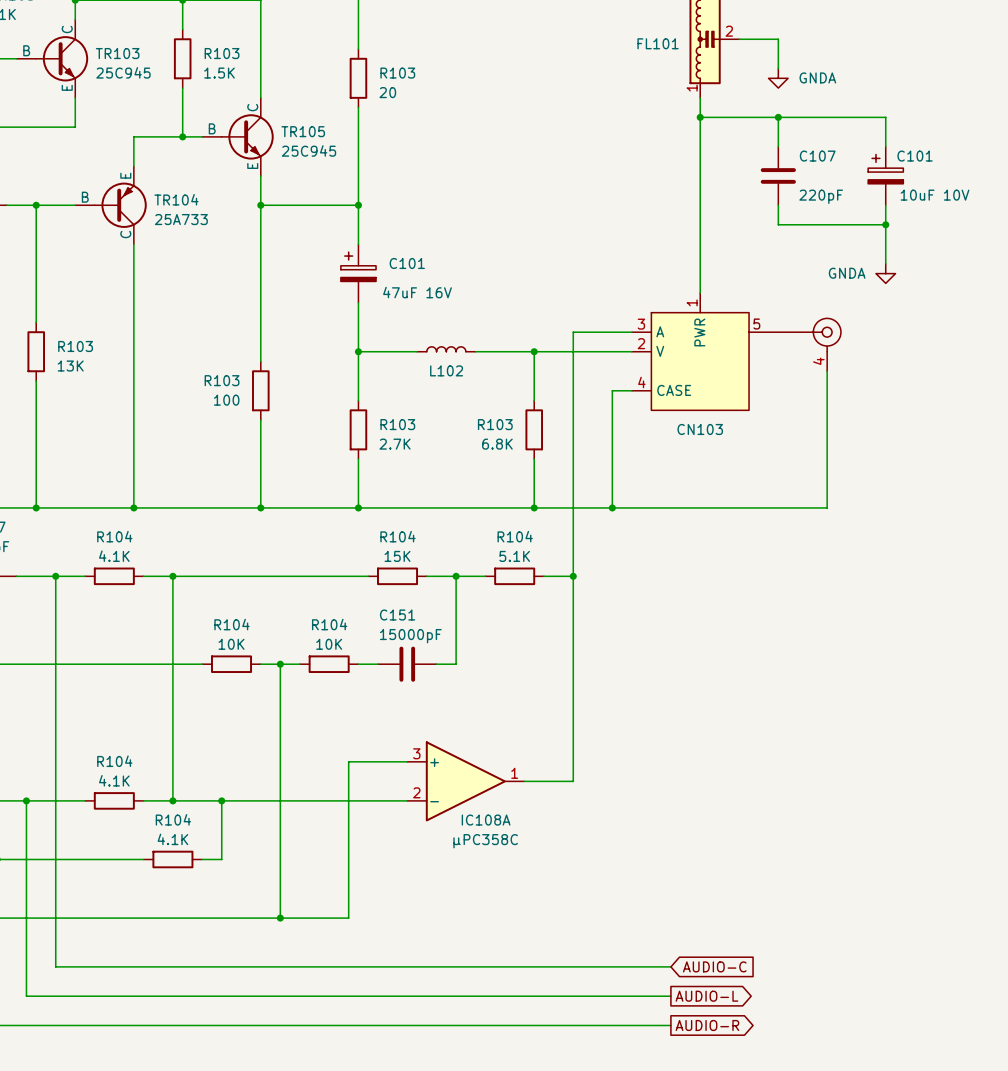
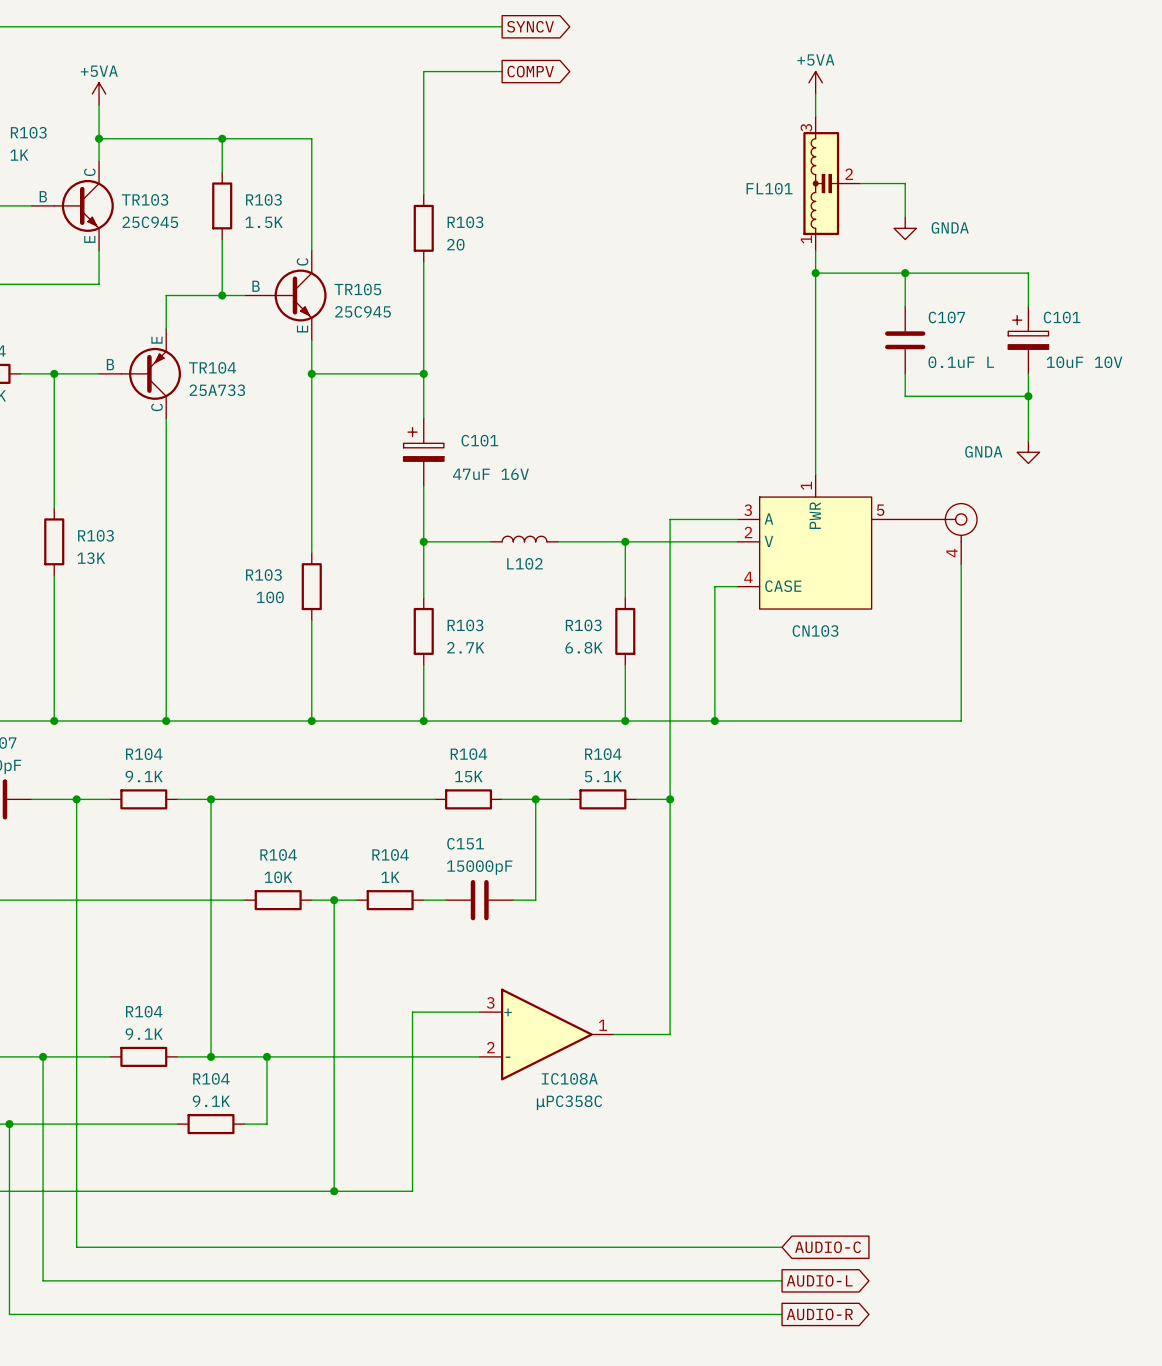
C107 value: 220pF (821, 196) -> 0.1uF L (961, 362)
R104 value: 4.1K (114, 556) -> 9.1K (144, 776)
R104 value: 10K (329, 644) -> 1K (390, 877)
R104 value: 4.1K (114, 780) -> 9.1K (144, 1034)
R104 value: 4.1K (172, 839) -> 9.1K (211, 1101)

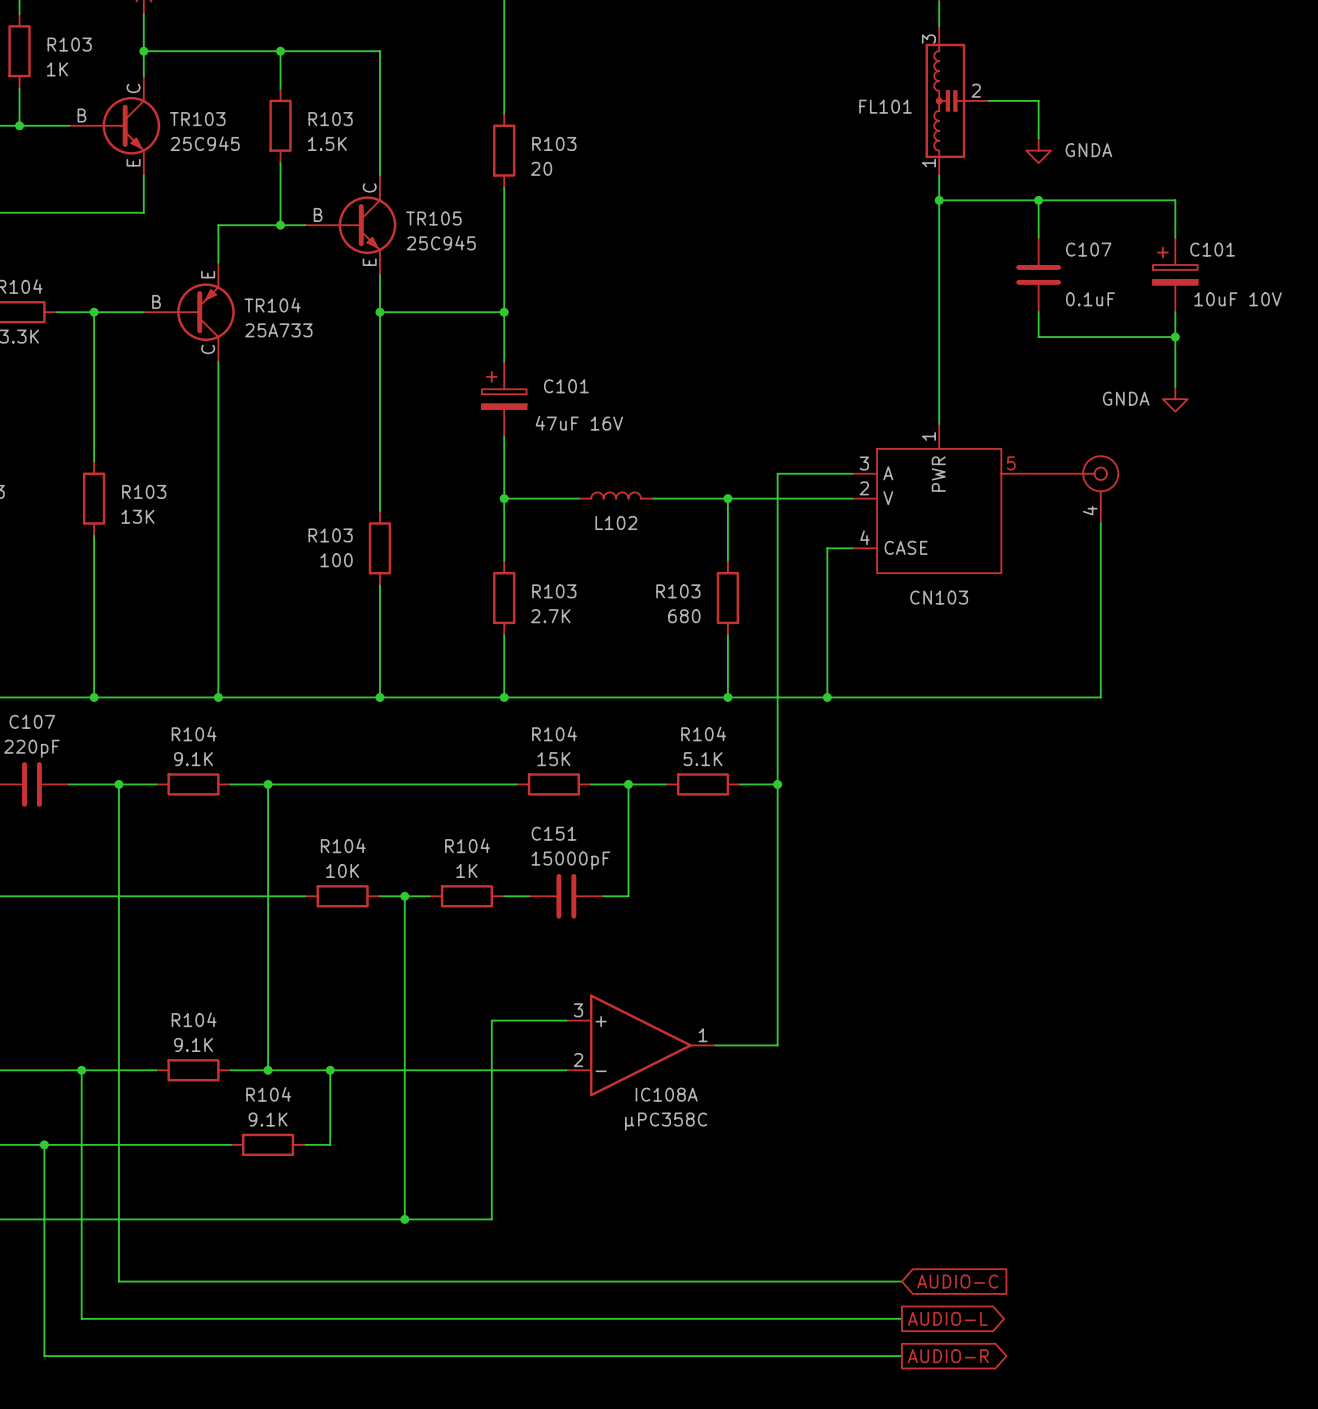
C107 value: 0.1uF L (961, 362) -> 0.1uF (1090, 299)
R103 value: 6.8K (583, 647) -> 680 (684, 616)

